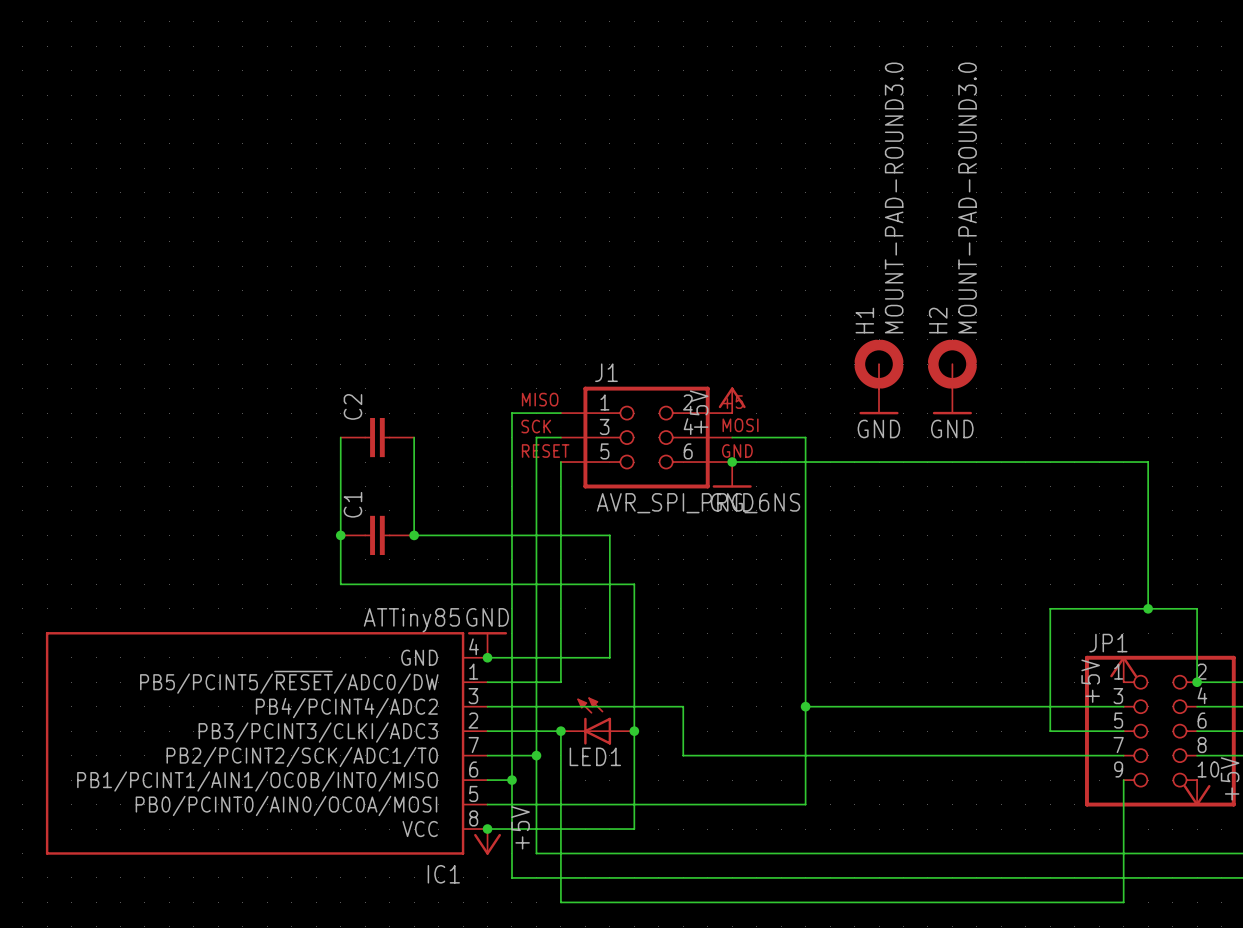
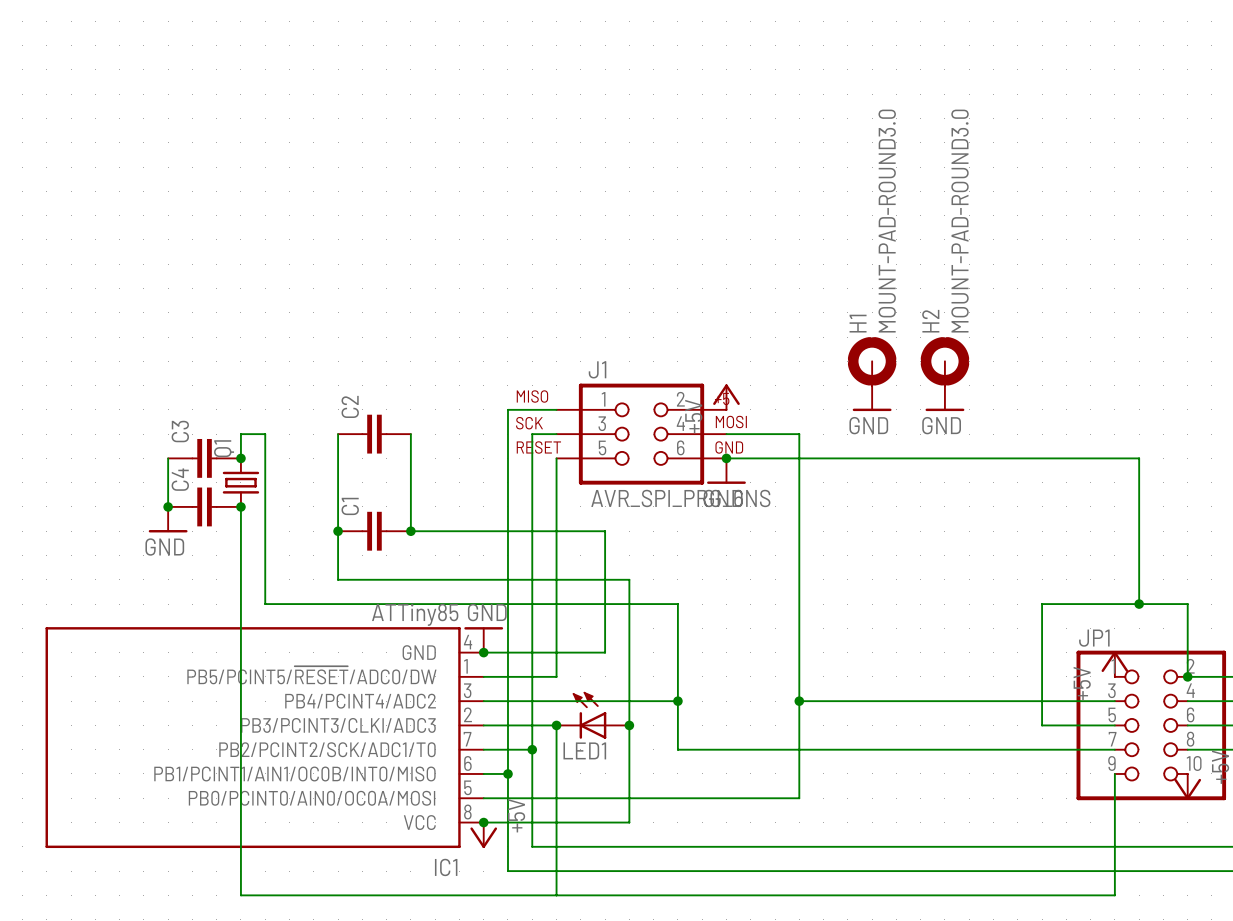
wire: none -> (168, 458) (168, 506)
C3: none -> (204, 458)
wire: none -> (240, 458) (240, 434) (265, 434) (265, 604) (677, 604) (677, 701)
junction: none -> (240, 458)
Q1: none -> (240, 482)
junction: none -> (168, 506)
C4: none -> (204, 506)
wire: none -> (240, 506) (240, 895) (556, 895)
junction: none -> (240, 506)
power symbol: none -> GND (168, 519)
junction: none -> (677, 701)

